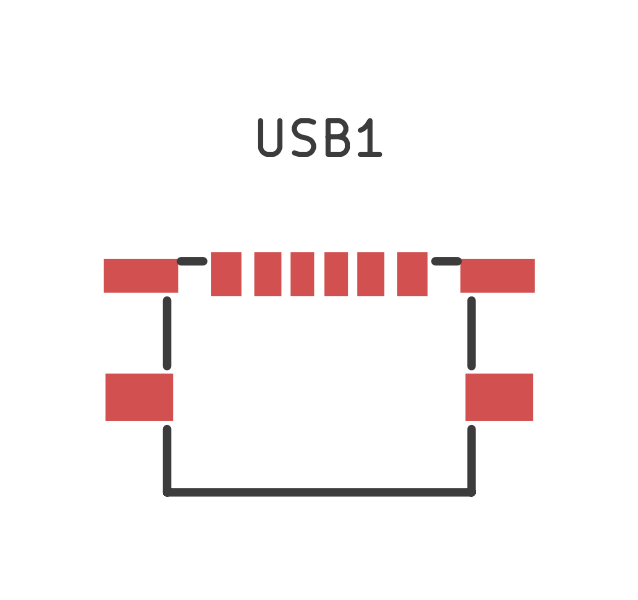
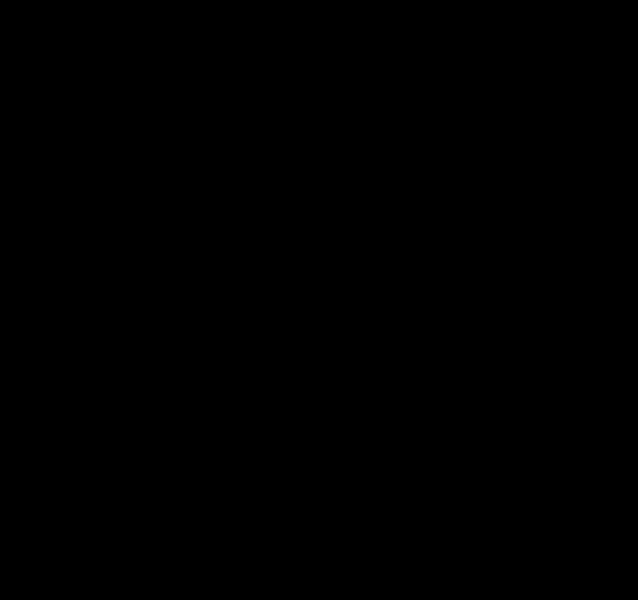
USB1: (319, 374) -> none

